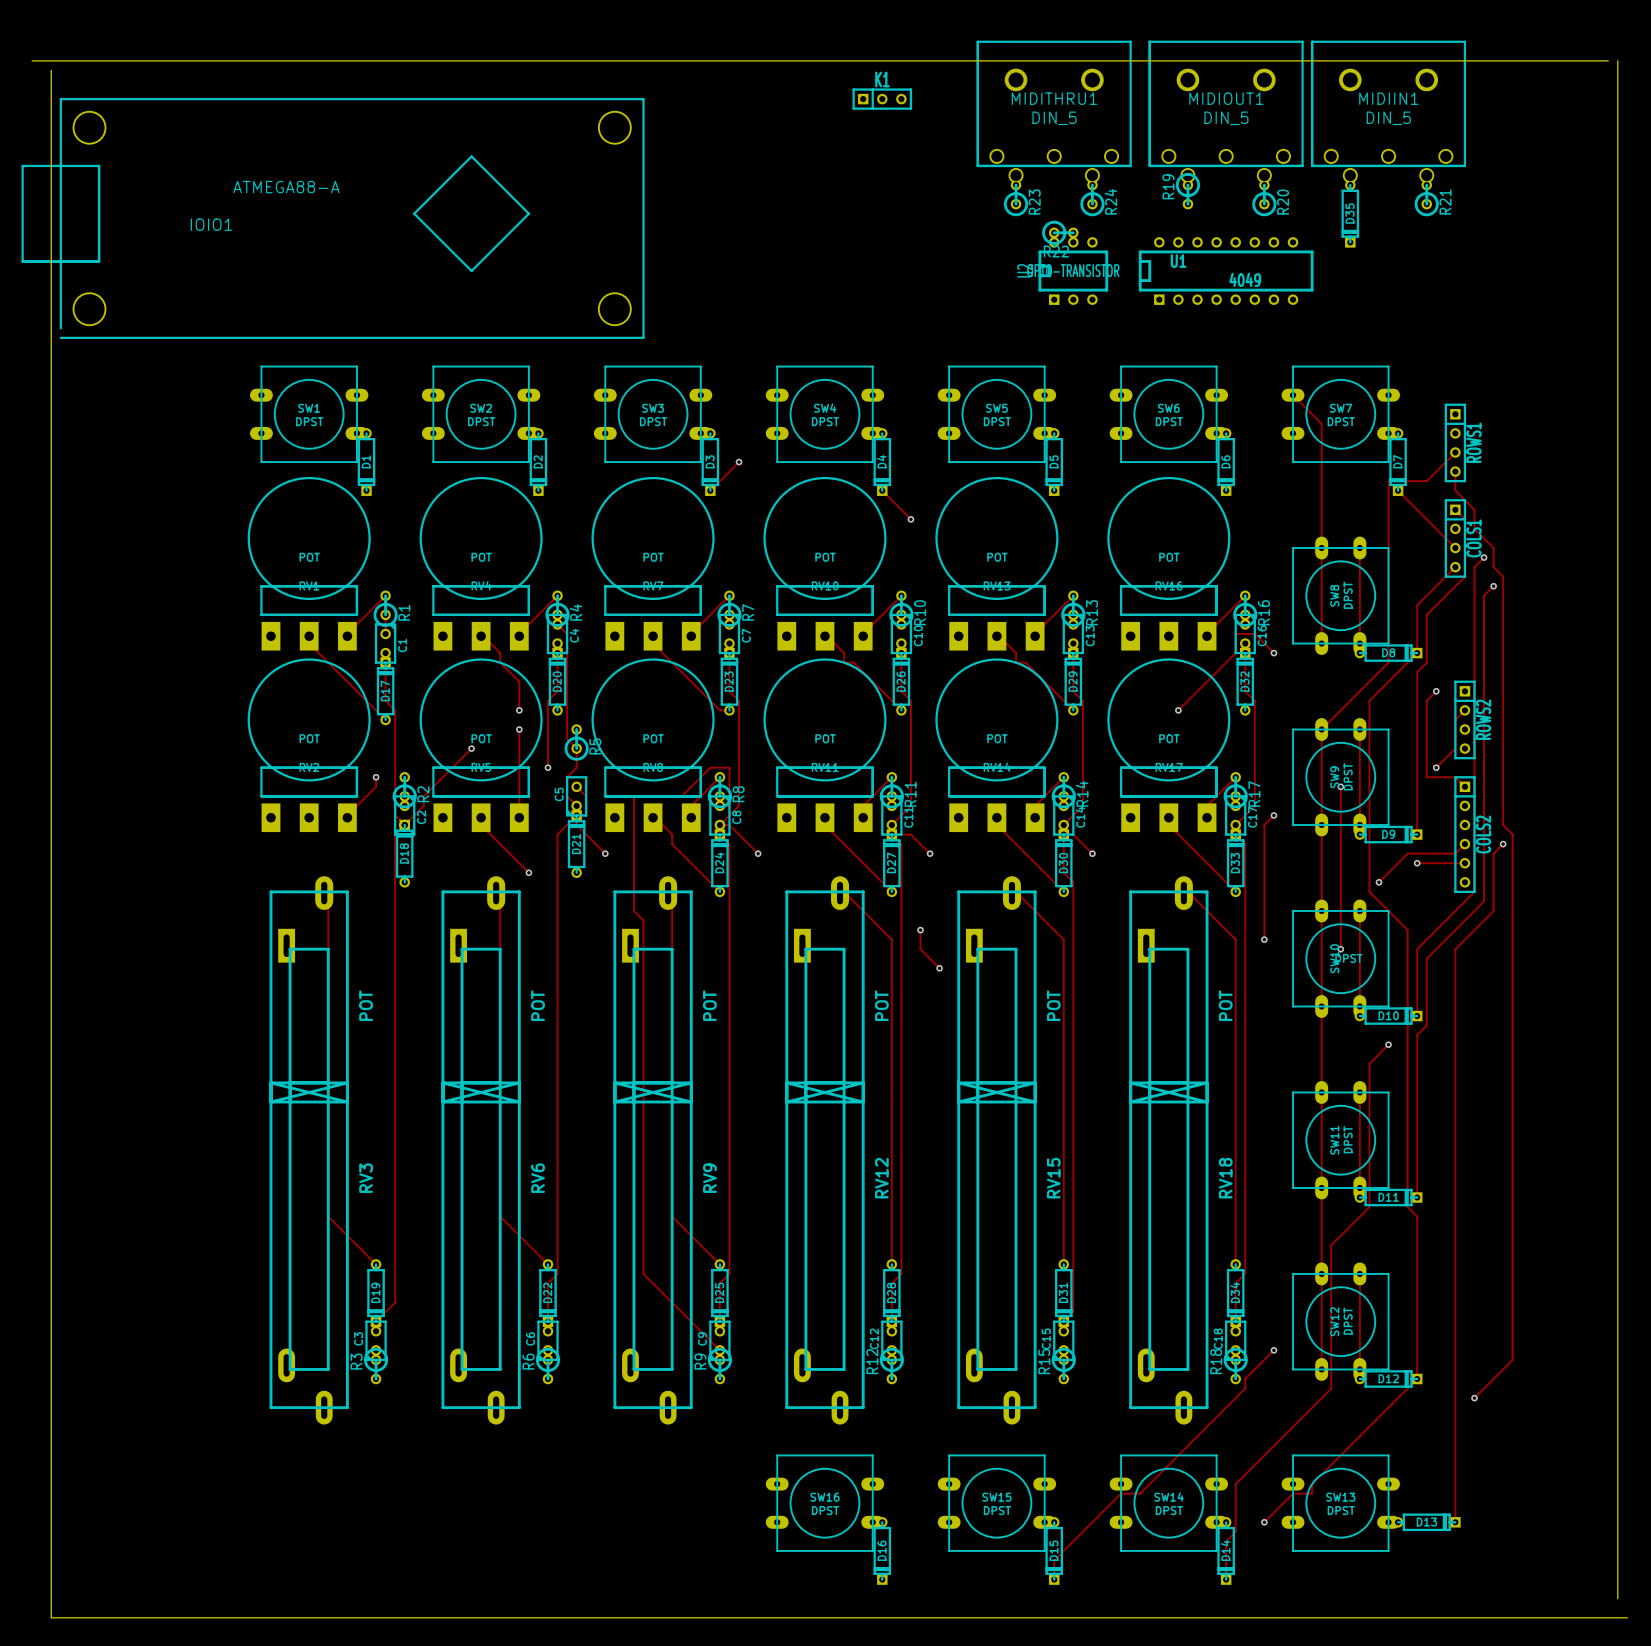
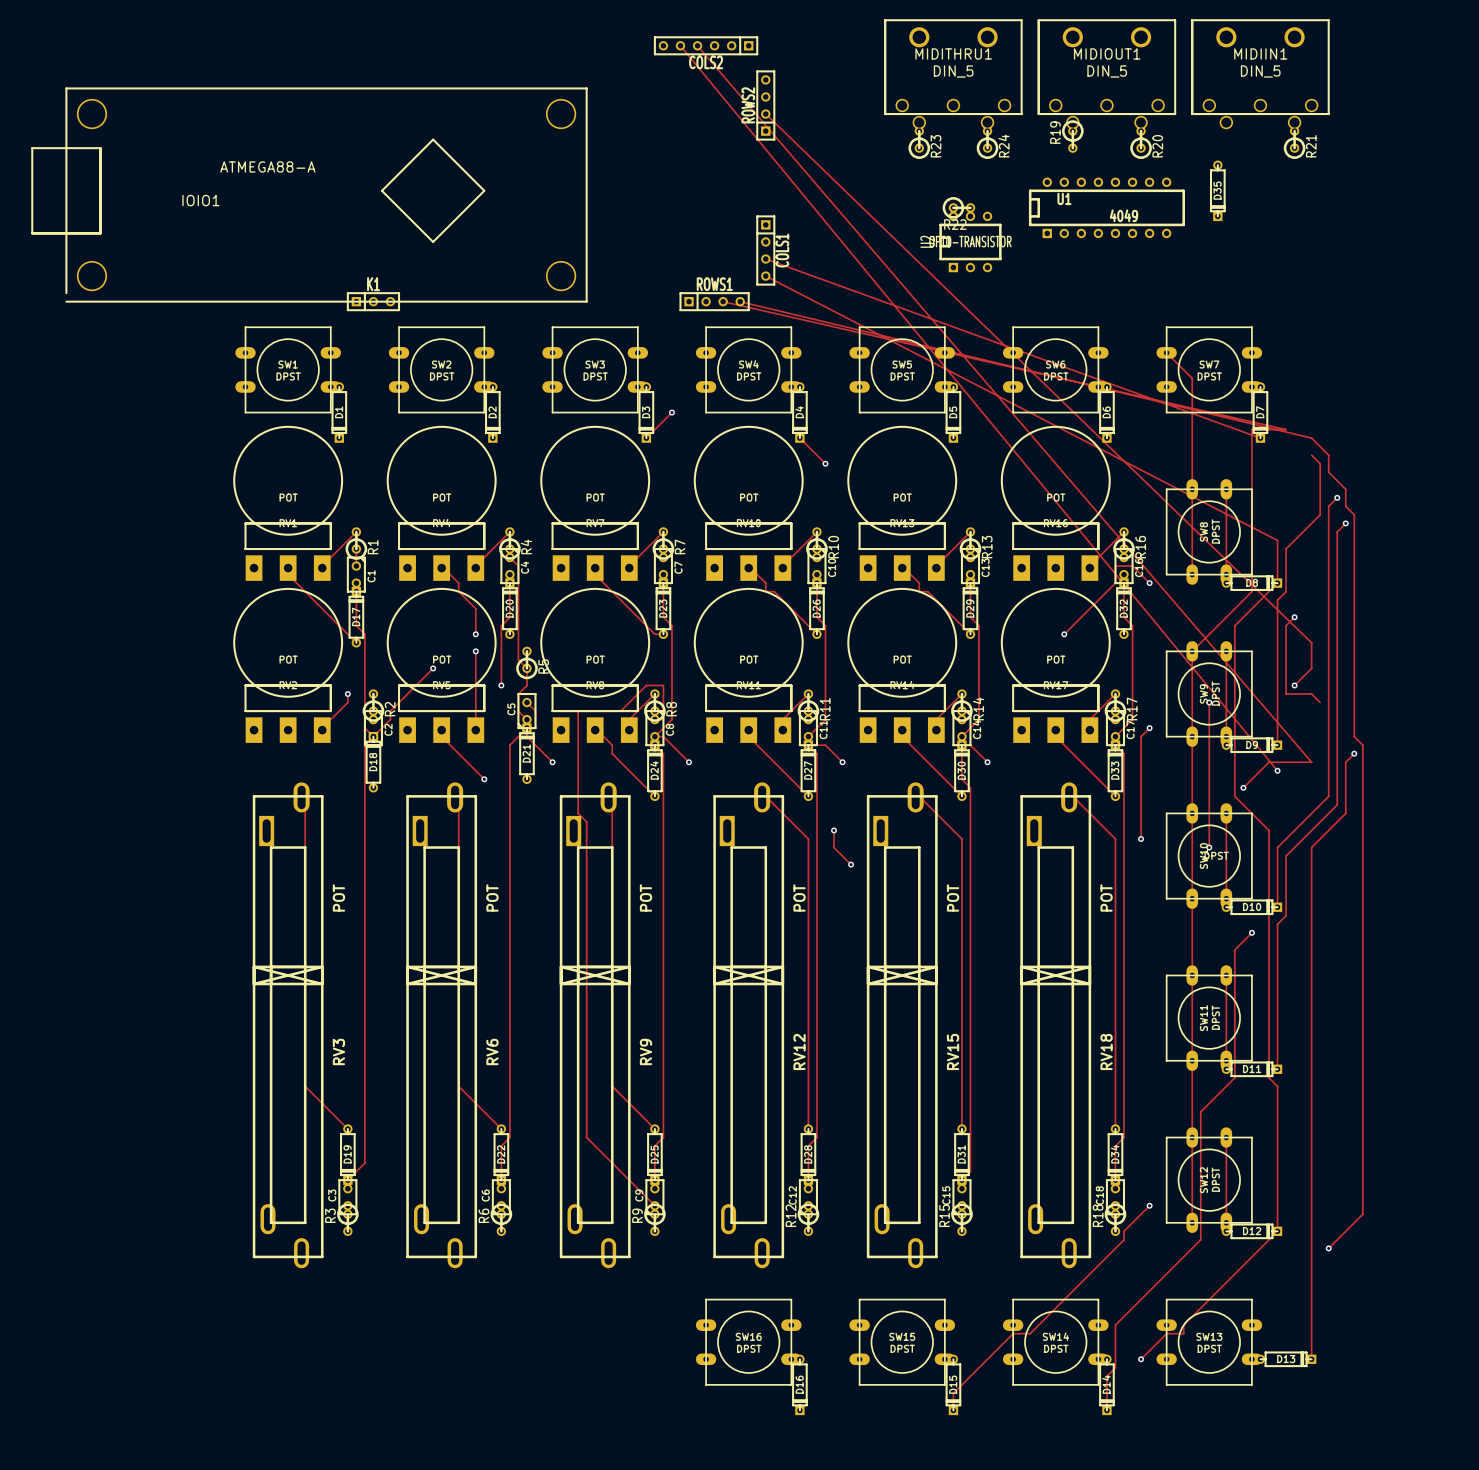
MIDITHRU1 footprint: [976, 40, 1132, 184] -> [884, 19, 1023, 130]
MIDIOUT1 footprint: [1148, 40, 1304, 184] -> [1037, 19, 1177, 130]
MIDIIN1 footprint: [1310, 40, 1467, 184] -> [1191, 19, 1330, 130]
board edge: (32, 60) (1608, 60) -> none
board edge: (1617, 60) (1617, 1598) -> none
board edge: (51, 70) (51, 1617) (1627, 1617) -> none
K1 position: (882, 99) -> (373, 301)
R19 position: (1187, 191) -> (1072, 136)
R23 position: (1016, 198) -> (919, 142)
R24 position: (1092, 198) -> (987, 142)
R20 position: (1264, 198) -> (1141, 142)
R21 position: (1426, 198) -> (1294, 142)
U1 position: (1226, 271) -> (1106, 207)
ROWS1 rotation: 0° (1455, 442) -> 90° counterclockwise (714, 301)
ROWS1 position: (1455, 442) -> (714, 301)
track: (1455, 452) (1426, 481) -> (723, 301) (1286, 429)
track: (1455, 471) (1455, 490) -> (740, 301) (1311, 438)
track: (1398, 490) (1455, 548) -> (1260, 438) (765, 259)
COLS1 position: (1455, 538) -> (765, 250)
track: (1455, 567) (1417, 605) -> (765, 276) (1277, 540)
track: (1464, 710) (1455, 719) -> (765, 114) (1311, 642)
ROWS2 rotation: 0° (1464, 719) -> 180° (765, 105)
ROWS2 position: (1464, 719) -> (765, 105)
COLS2 rotation: 0° (1464, 834) -> 90° clockwise (706, 45)
COLS2 position: (1464, 834) -> (706, 45)
track: (1464, 844) (1455, 853) -> (697, 45) (1311, 762)
track: (1417, 863) (1464, 863) -> (1277, 770) (680, 45)
RV3 footprint: [269, 876, 349, 1425] -> [252, 782, 324, 1269]
RV6 footprint: [441, 876, 521, 1425] -> [406, 782, 478, 1269]
RV9 footprint: [613, 876, 693, 1425] -> [559, 782, 631, 1269]
RV12 footprint: [785, 876, 865, 1425] -> [713, 782, 785, 1269]
RV15 footprint: [957, 876, 1037, 1425] -> [866, 782, 938, 1269]
RV18 footprint: [1129, 876, 1209, 1425] -> [1020, 782, 1092, 1269]

